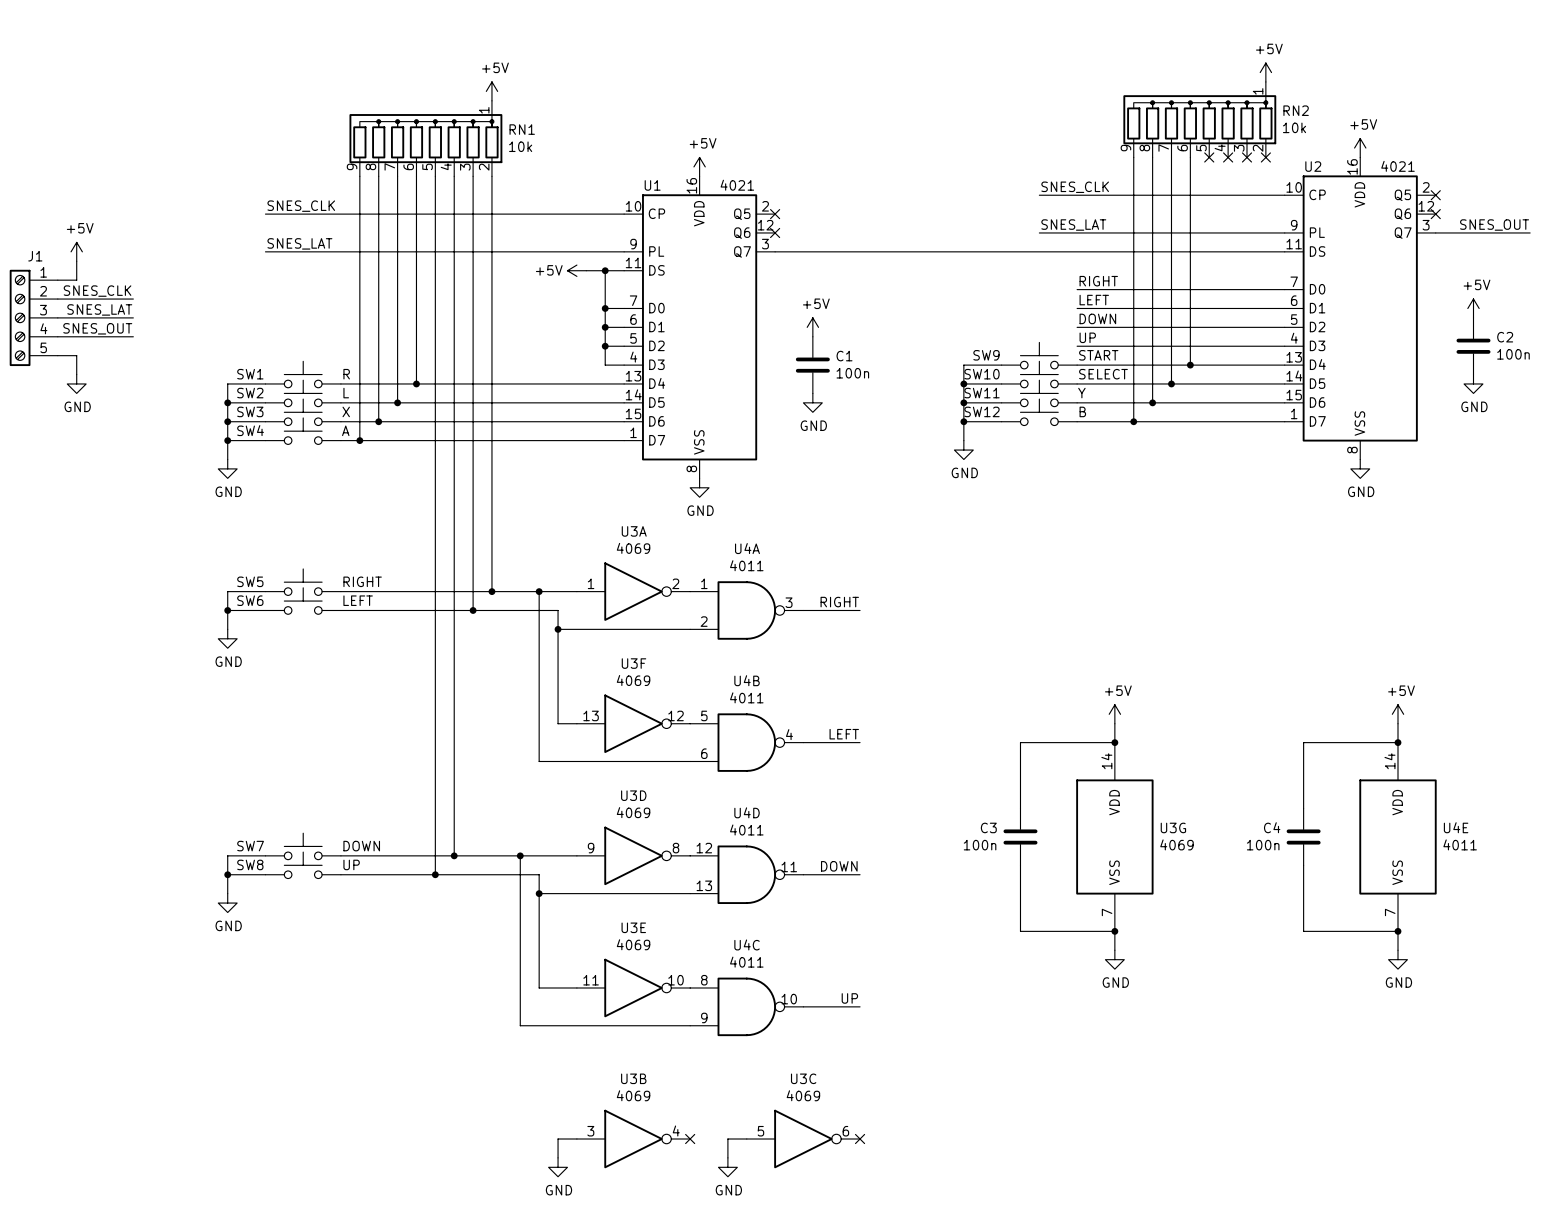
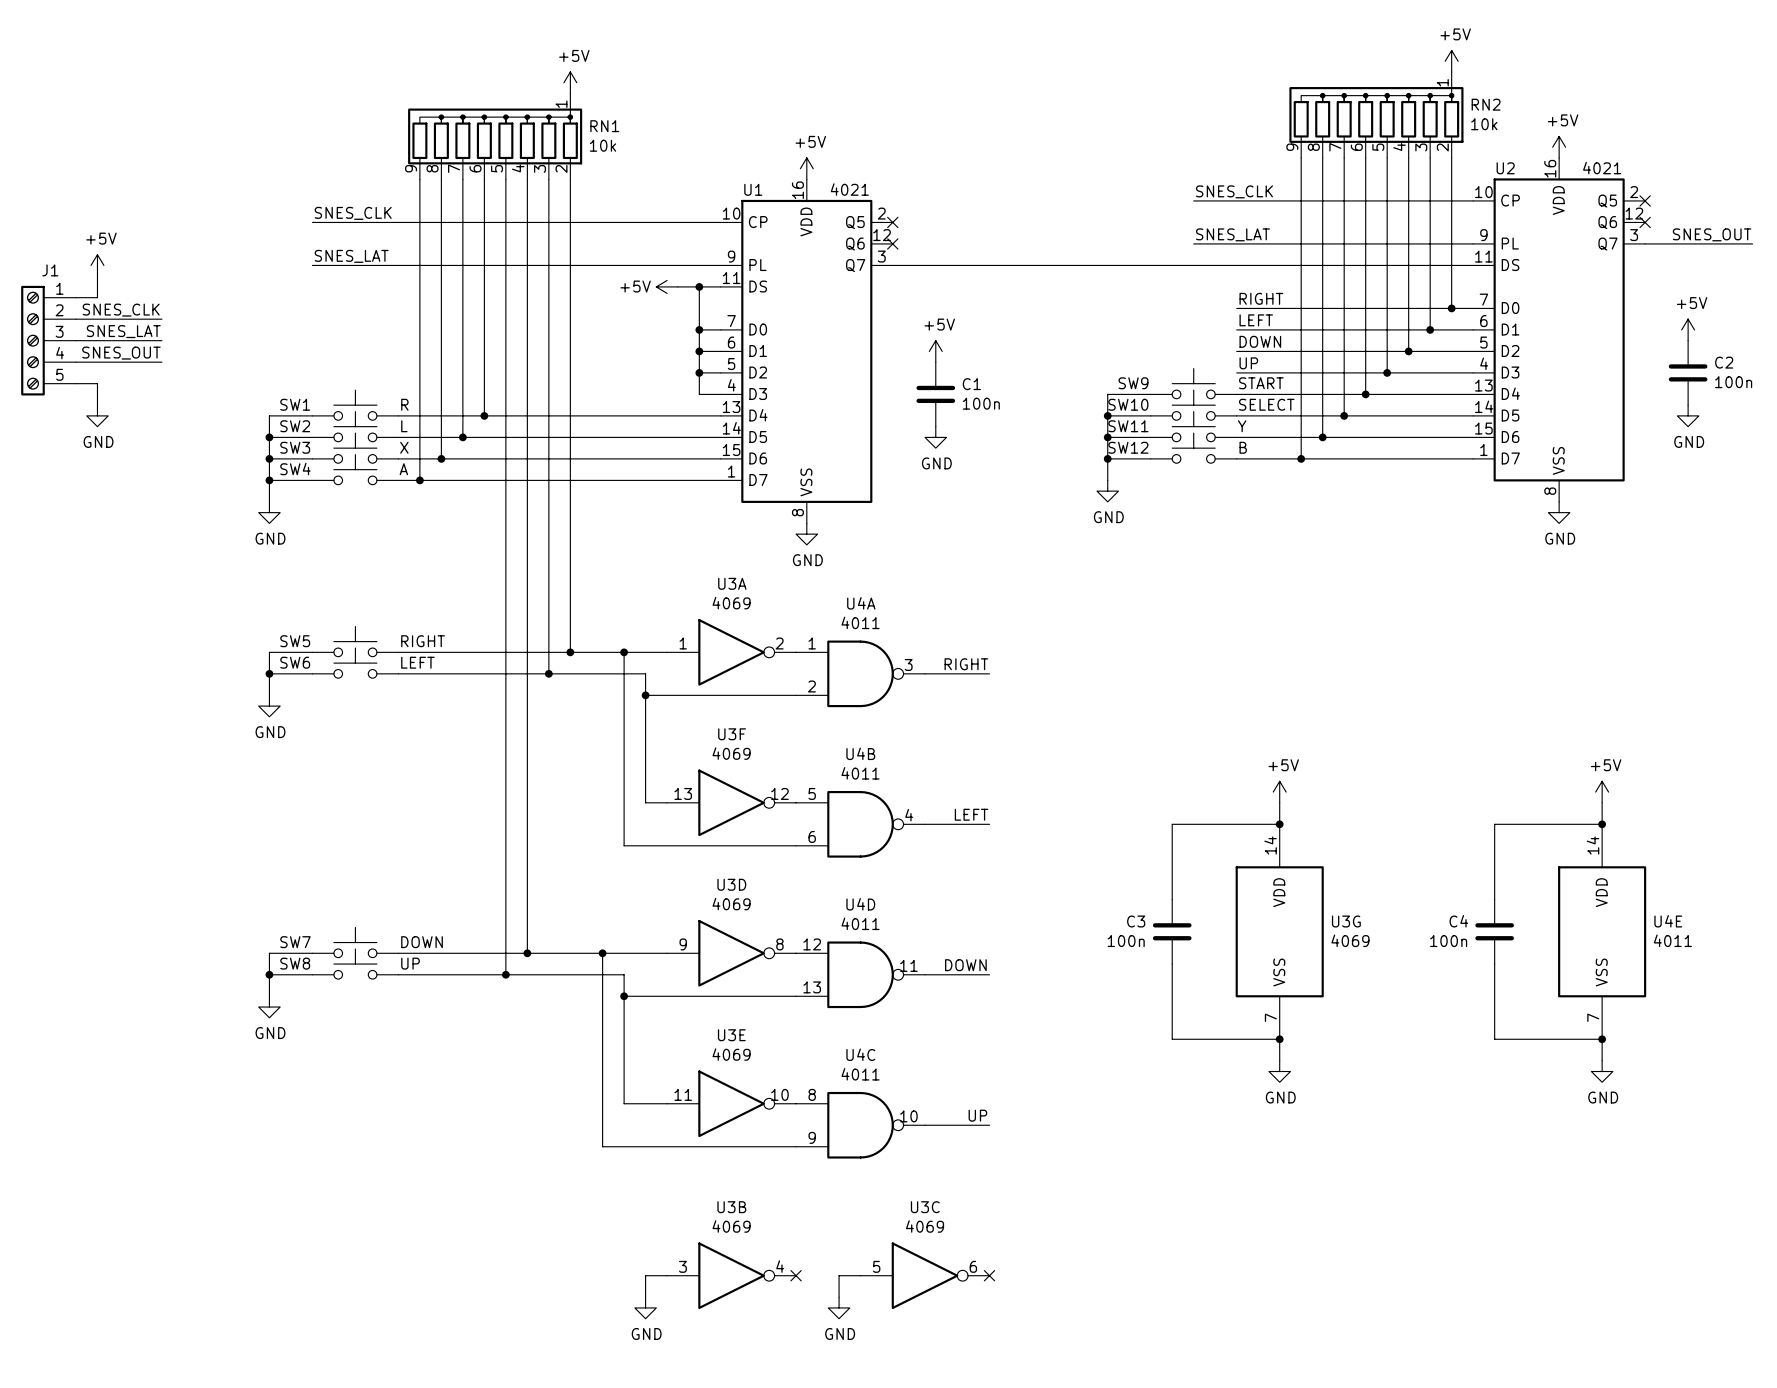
wire: none -> (1387, 157) (1387, 372)
no-connect mark: (1209, 157) -> none
wire: none -> (1408, 157) (1408, 351)
no-connect mark: (1228, 157) -> none
wire: none -> (1430, 157) (1430, 329)
no-connect mark: (1246, 157) -> none
wire: none -> (1451, 157) (1451, 308)
no-connect mark: (1265, 157) -> none
junction: none -> (1451, 308)
junction: none -> (1430, 329)
junction: none -> (1408, 351)
junction: none -> (1387, 372)

